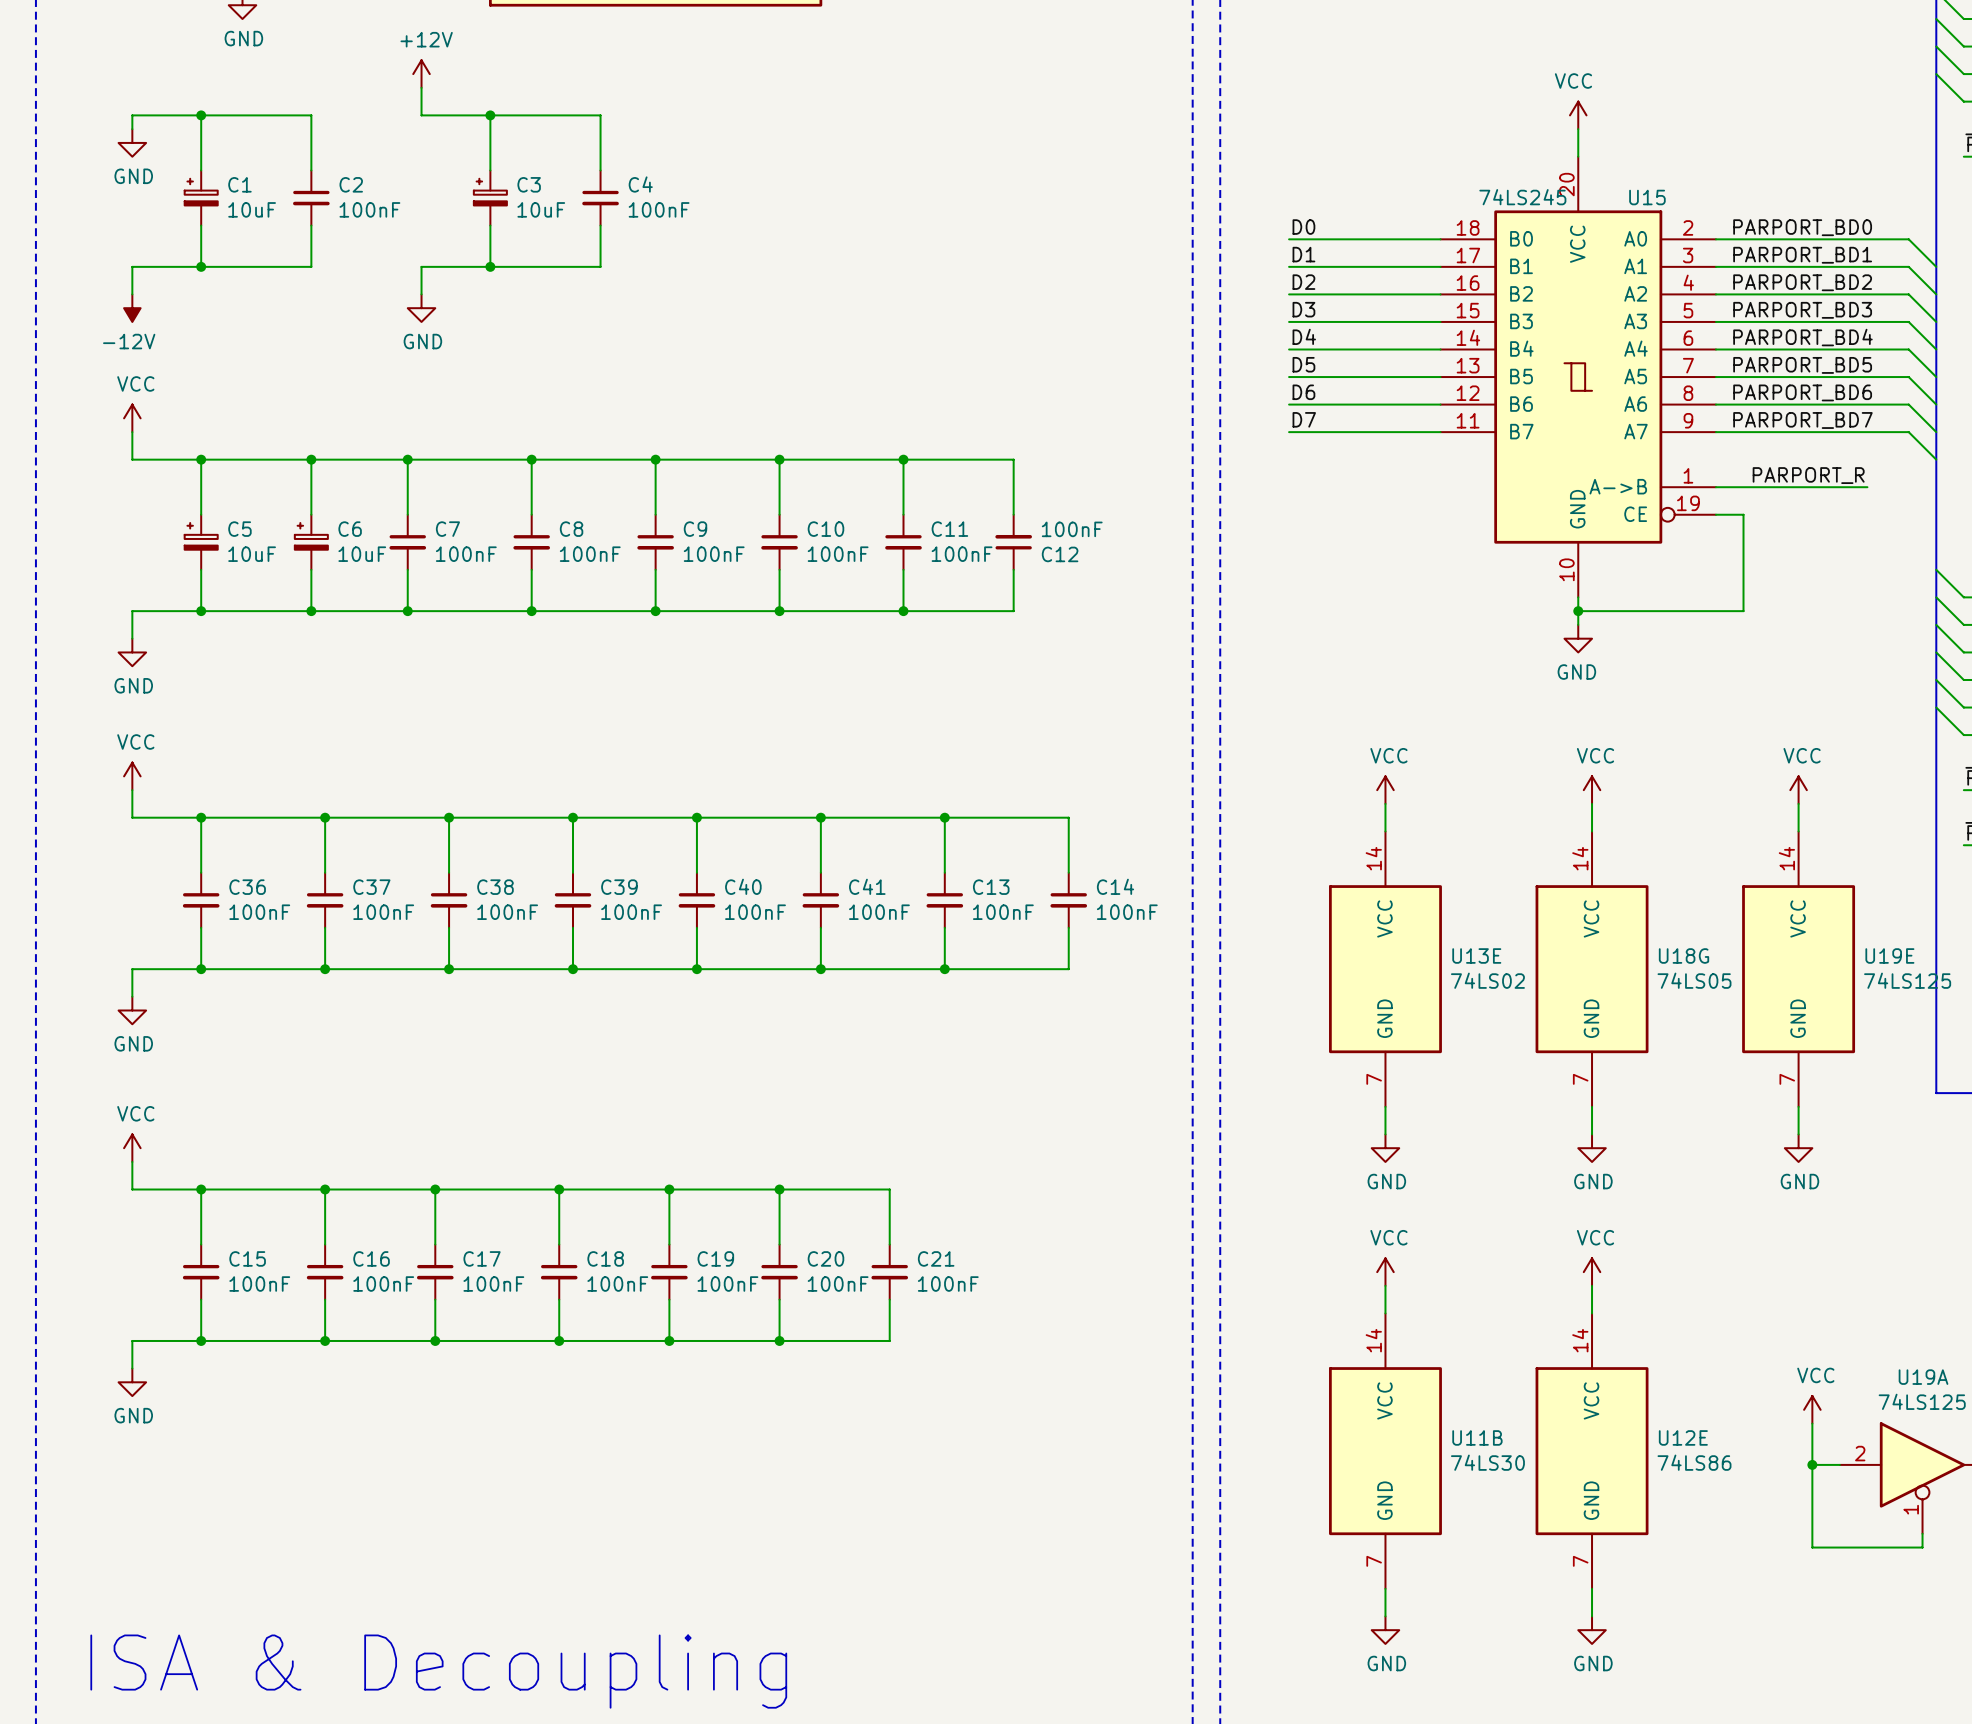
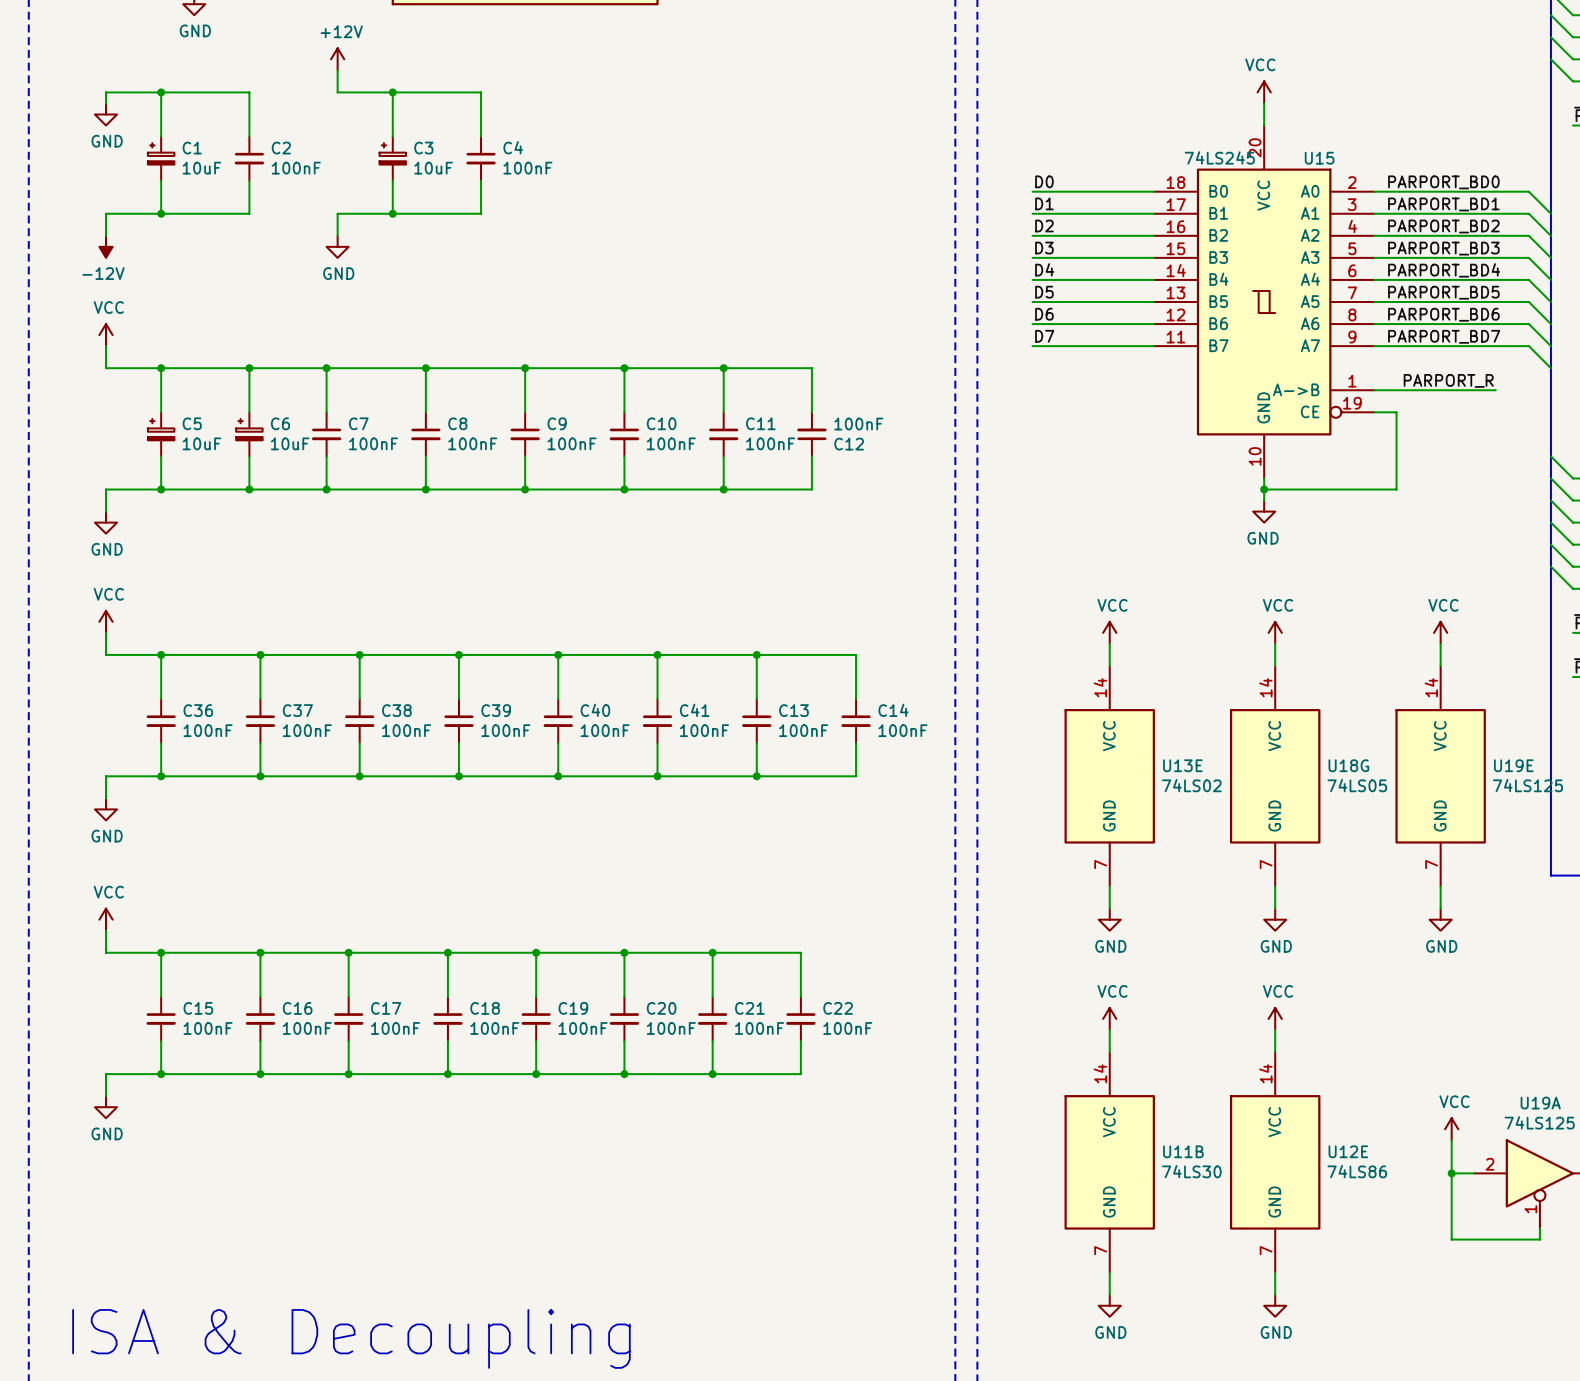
wire: none -> (712, 952) (800, 952) (800, 996)
junction: none -> (712, 952)
C22: none -> 100nF (800, 1018)
wire: none -> (800, 1041) (800, 1074) (712, 1074)
junction: none -> (712, 1074)

